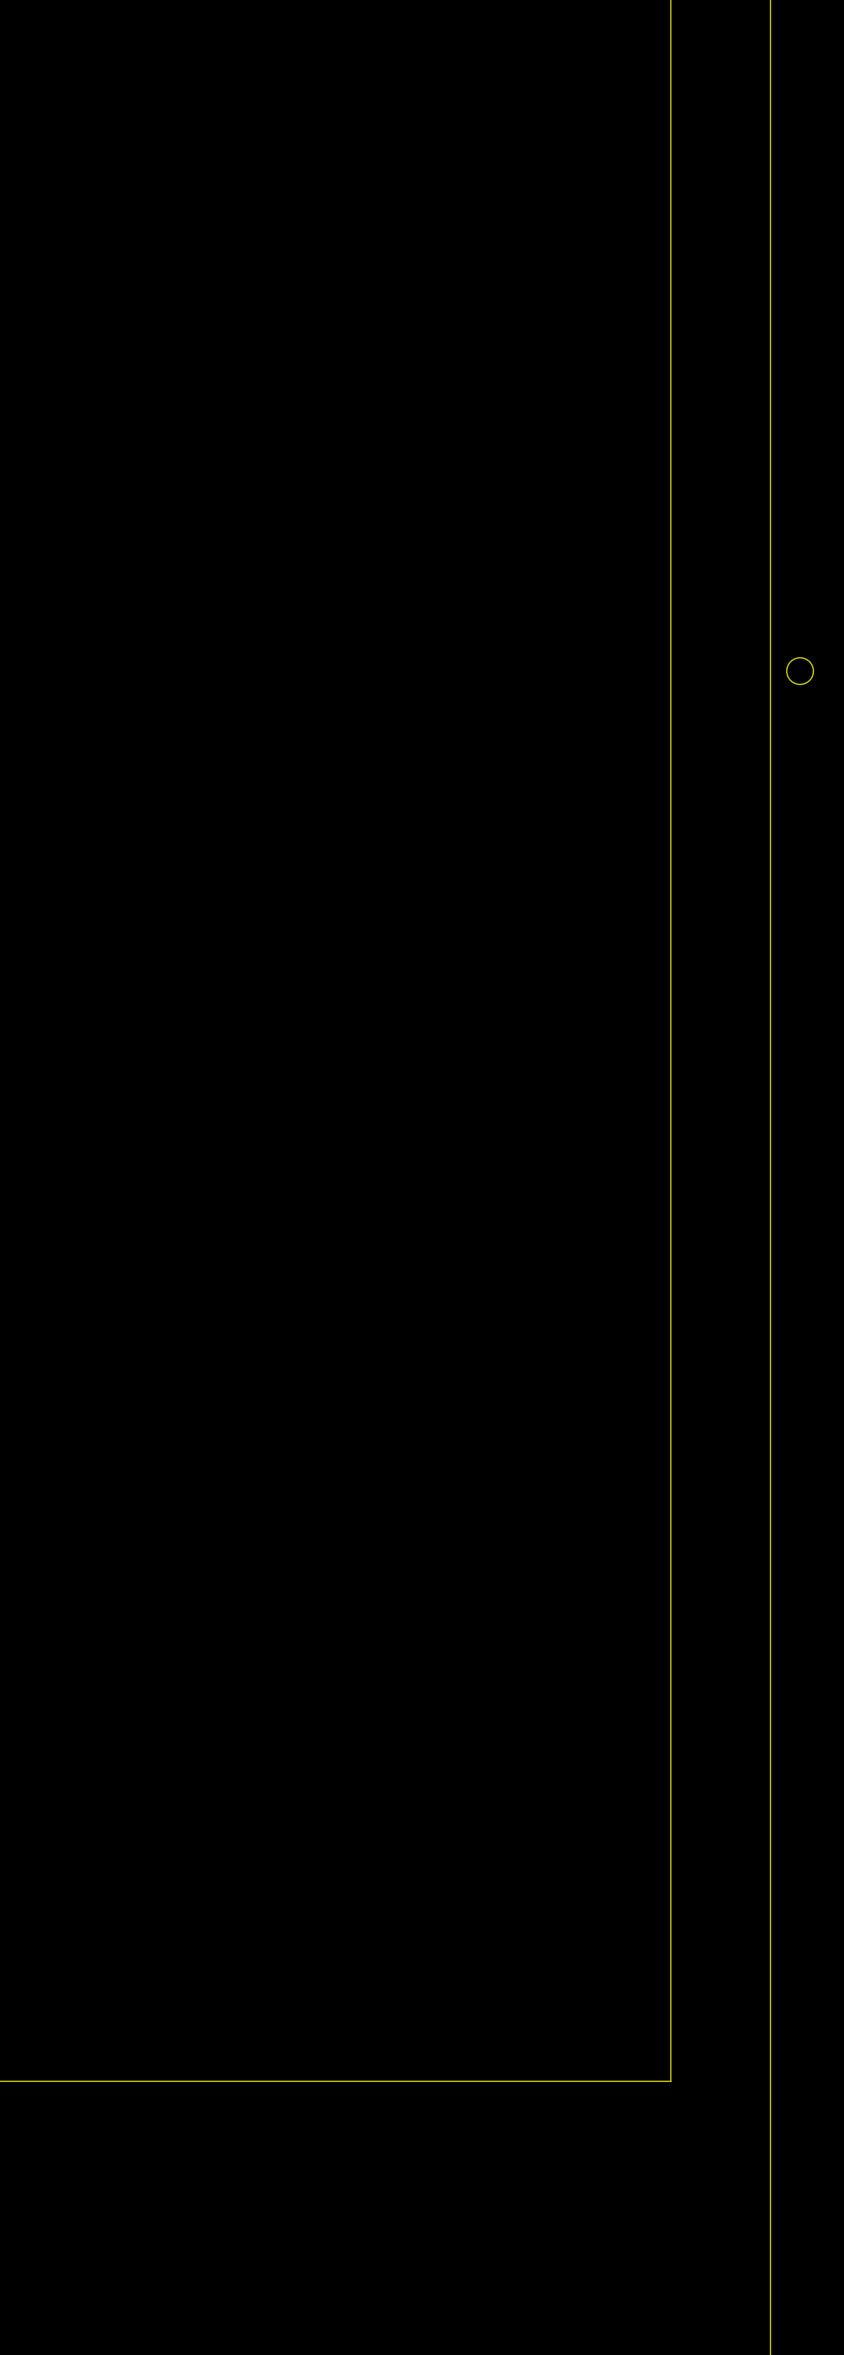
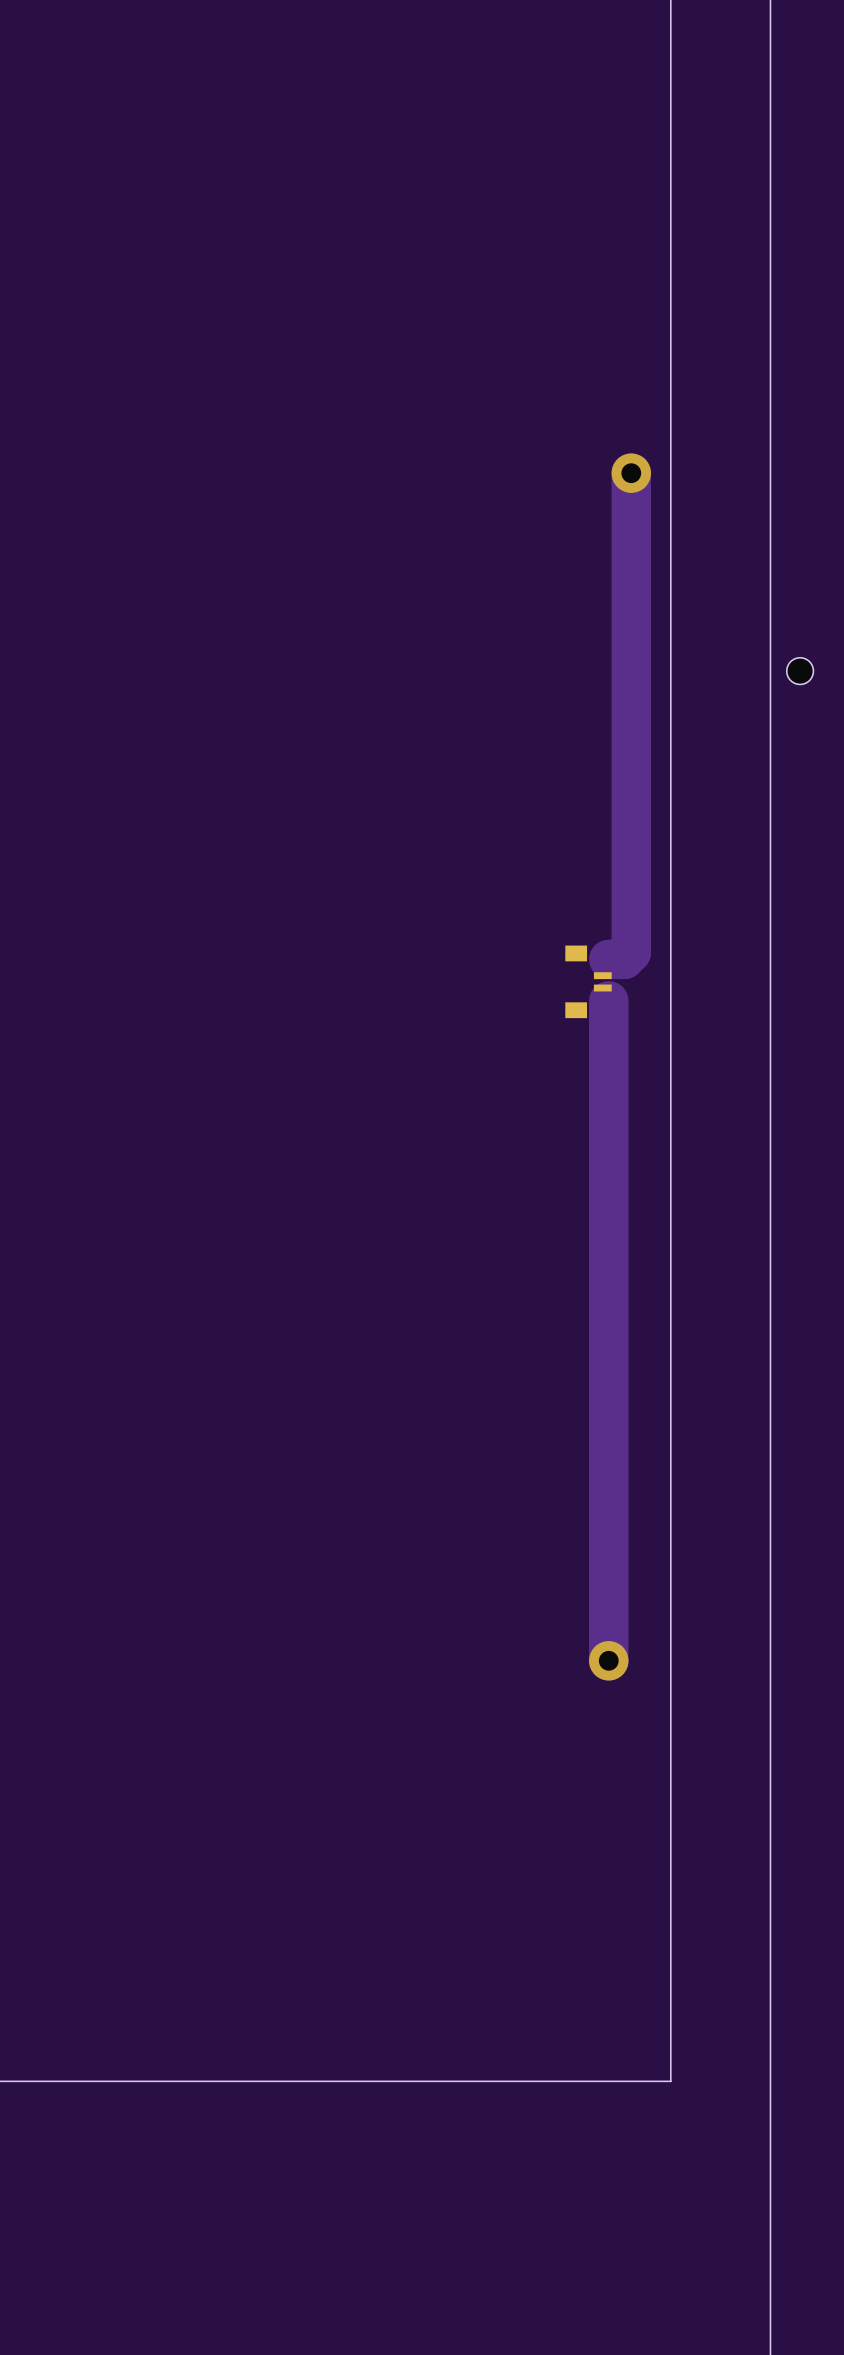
track: none -> (631, 473) (631, 952) (624, 959) (608, 959)
via: none -> (631, 473)
part: none -> (588, 981)
track: none -> (608, 1000) (608, 1660)
via: none -> (608, 1660)

